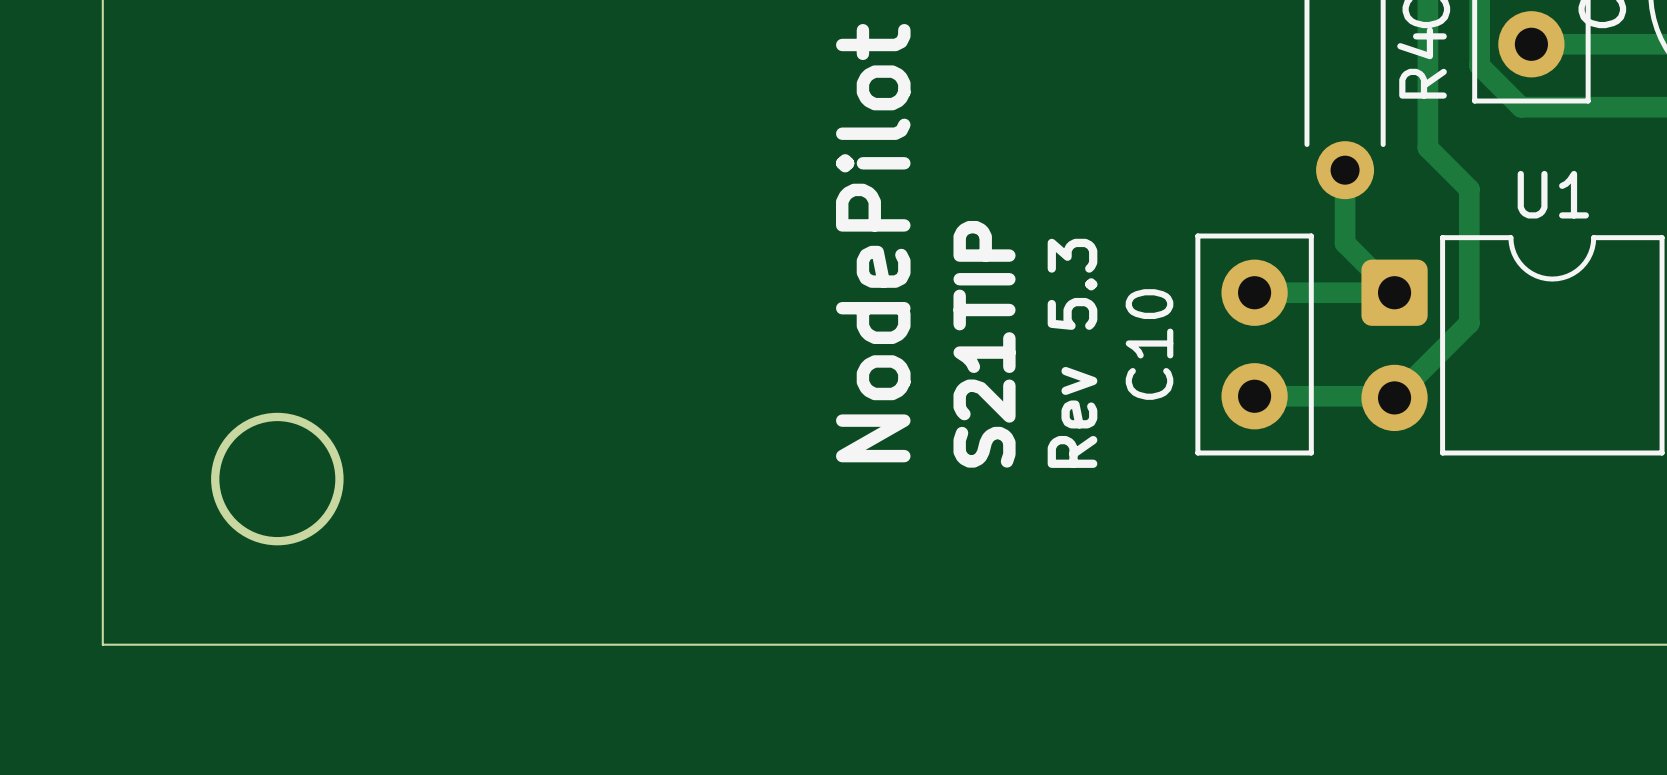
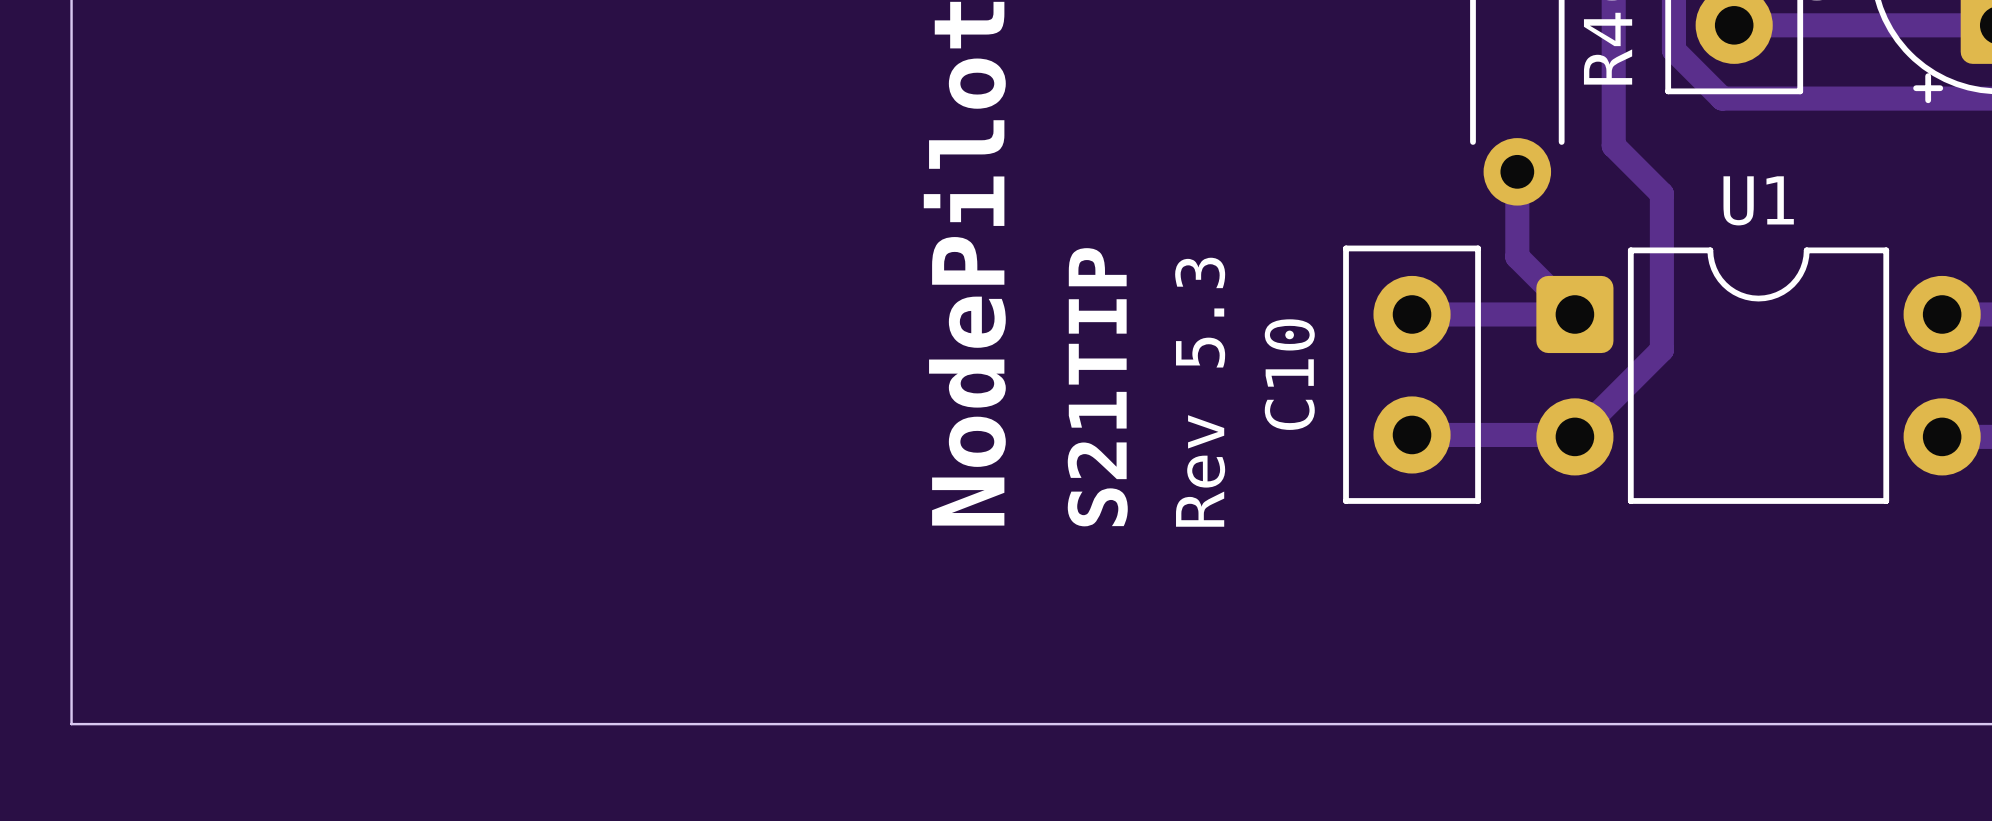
round board edge: [211, 412, 344, 546] -> none

